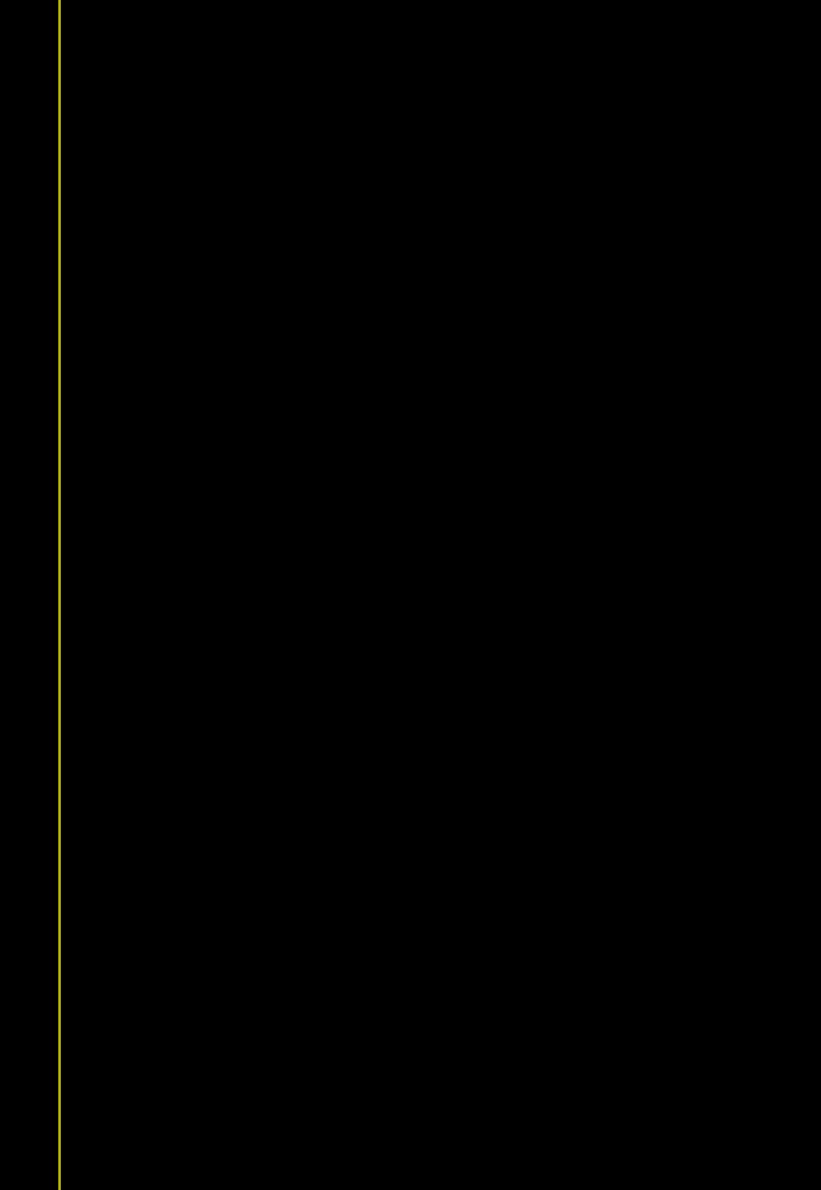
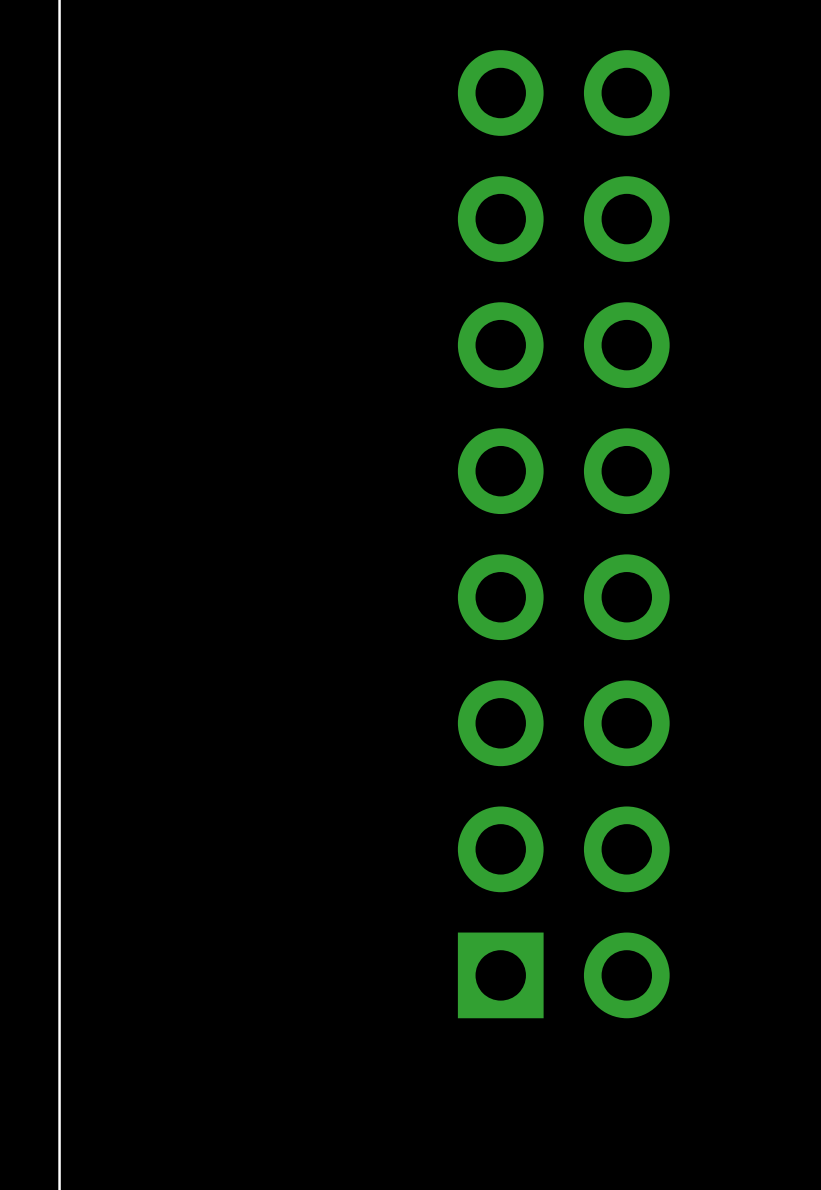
part: none -> (563, 534)

